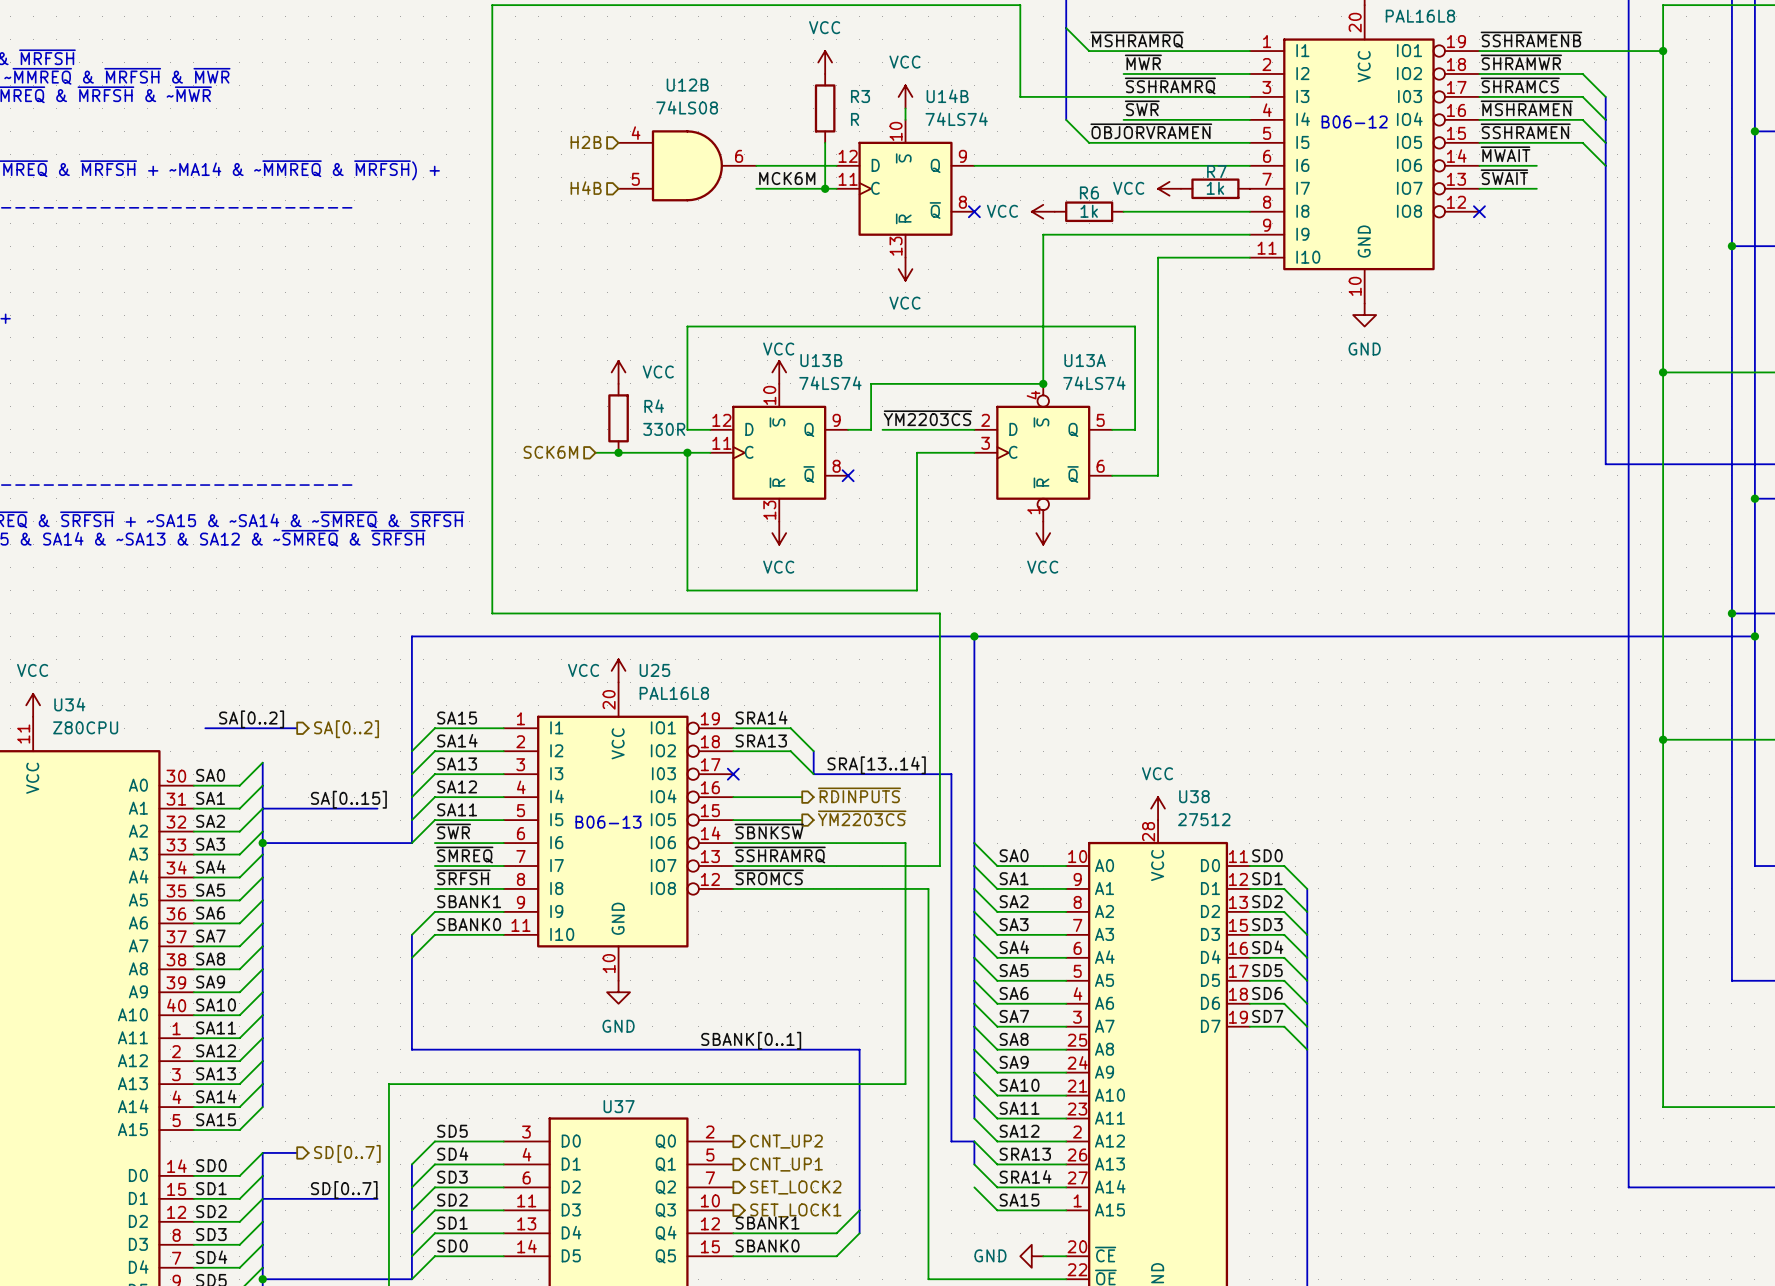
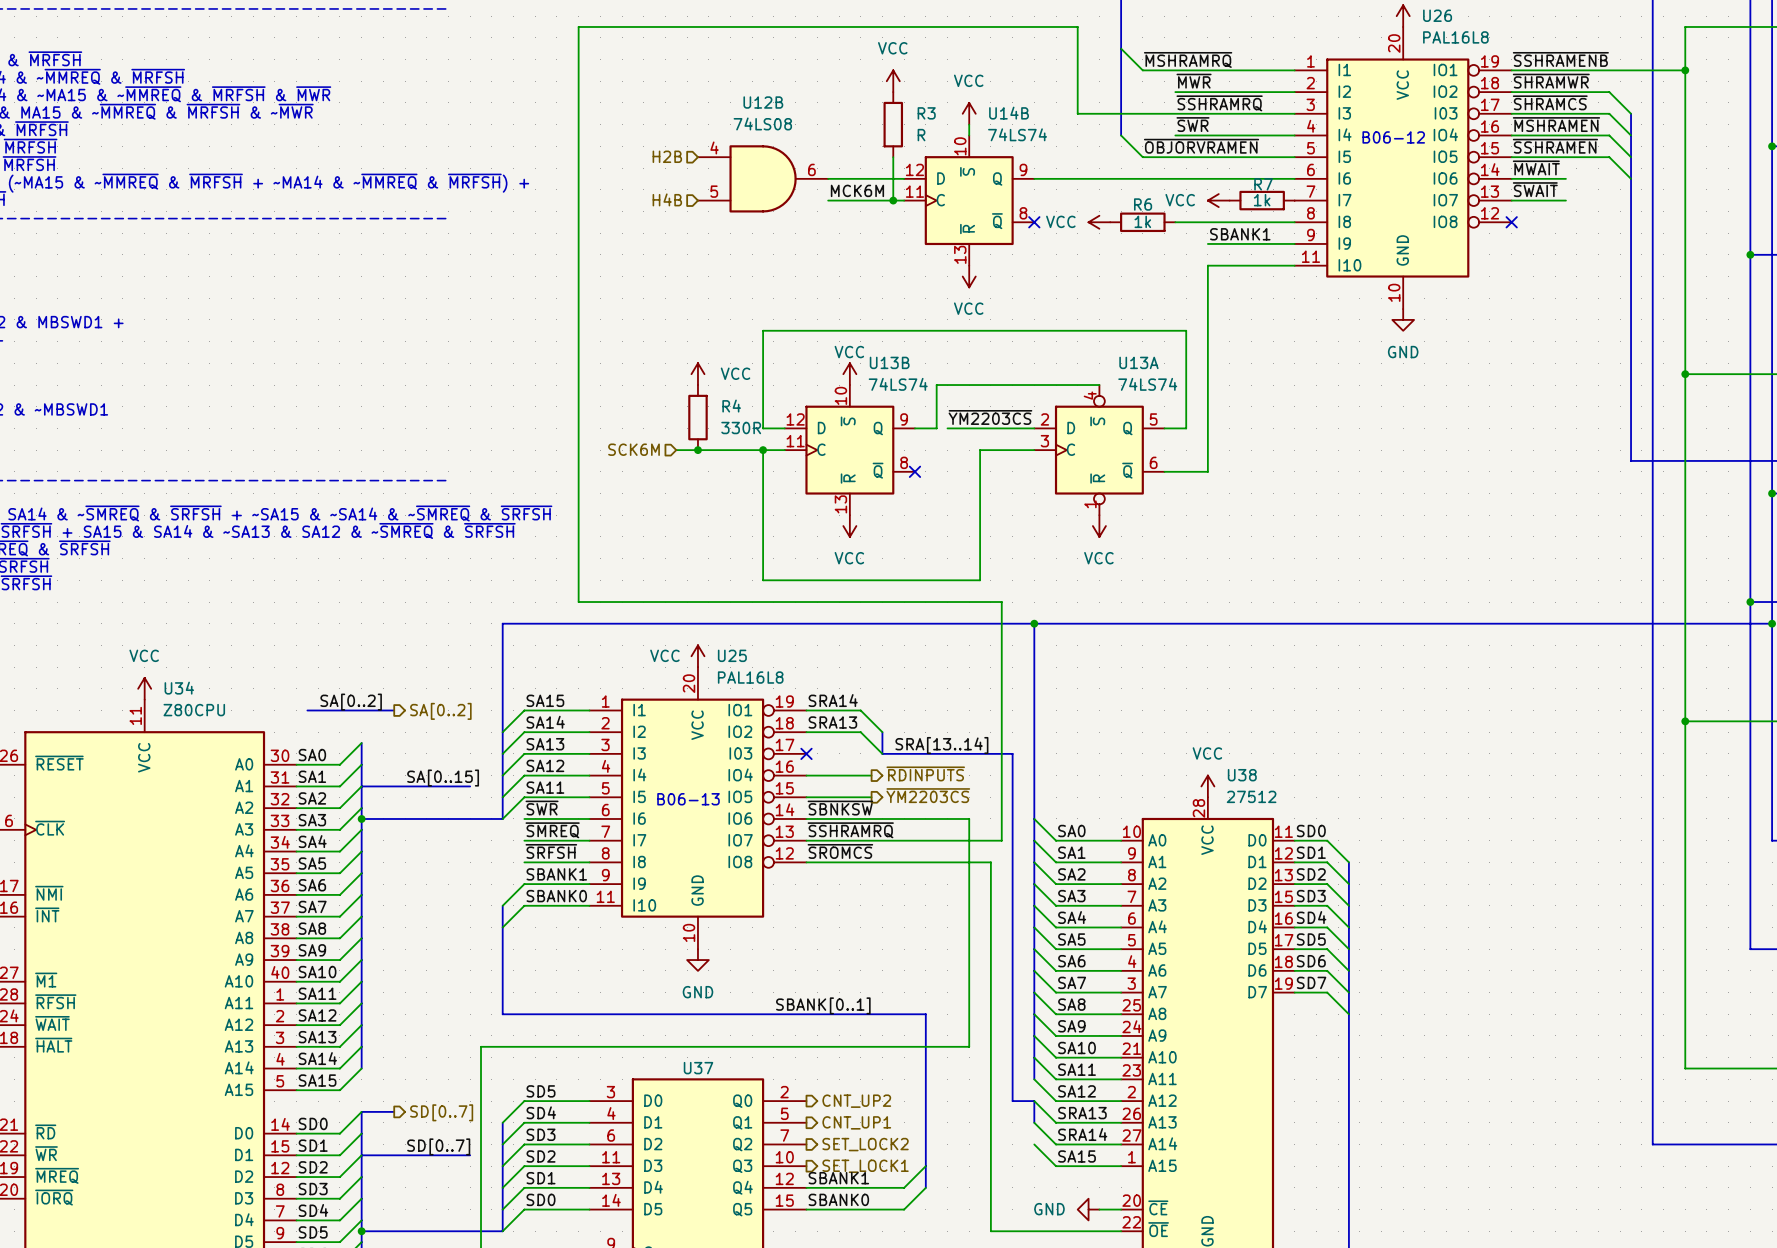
label: none -> SBANK1 (1240, 234)
wire: (1158, 234) (1043, 234) (1043, 383) -> none
junction: (1043, 383) -> none

